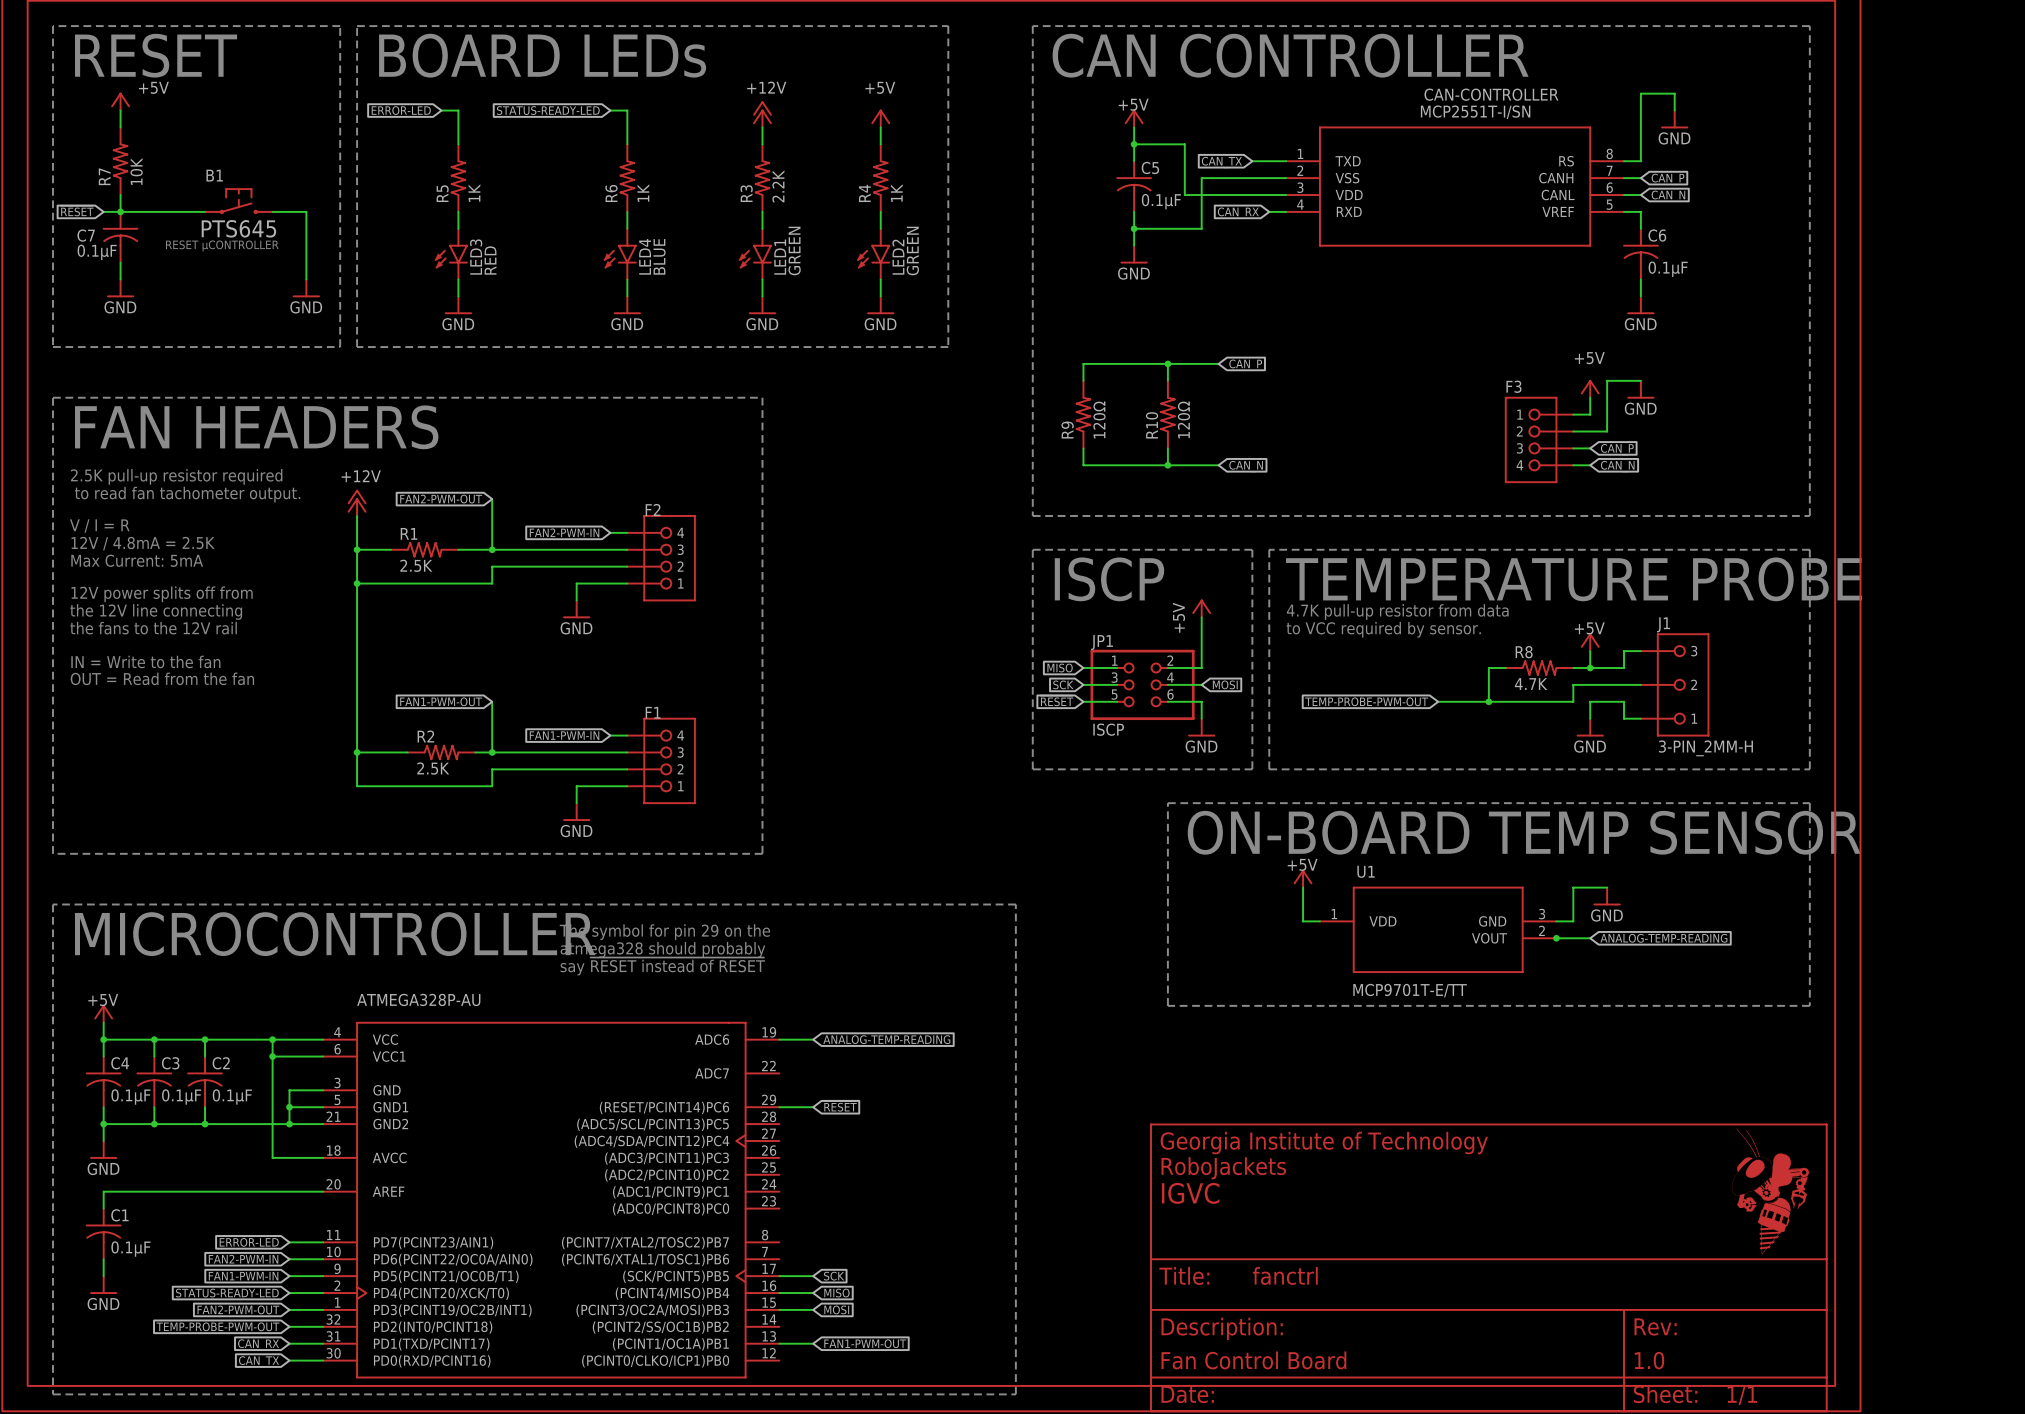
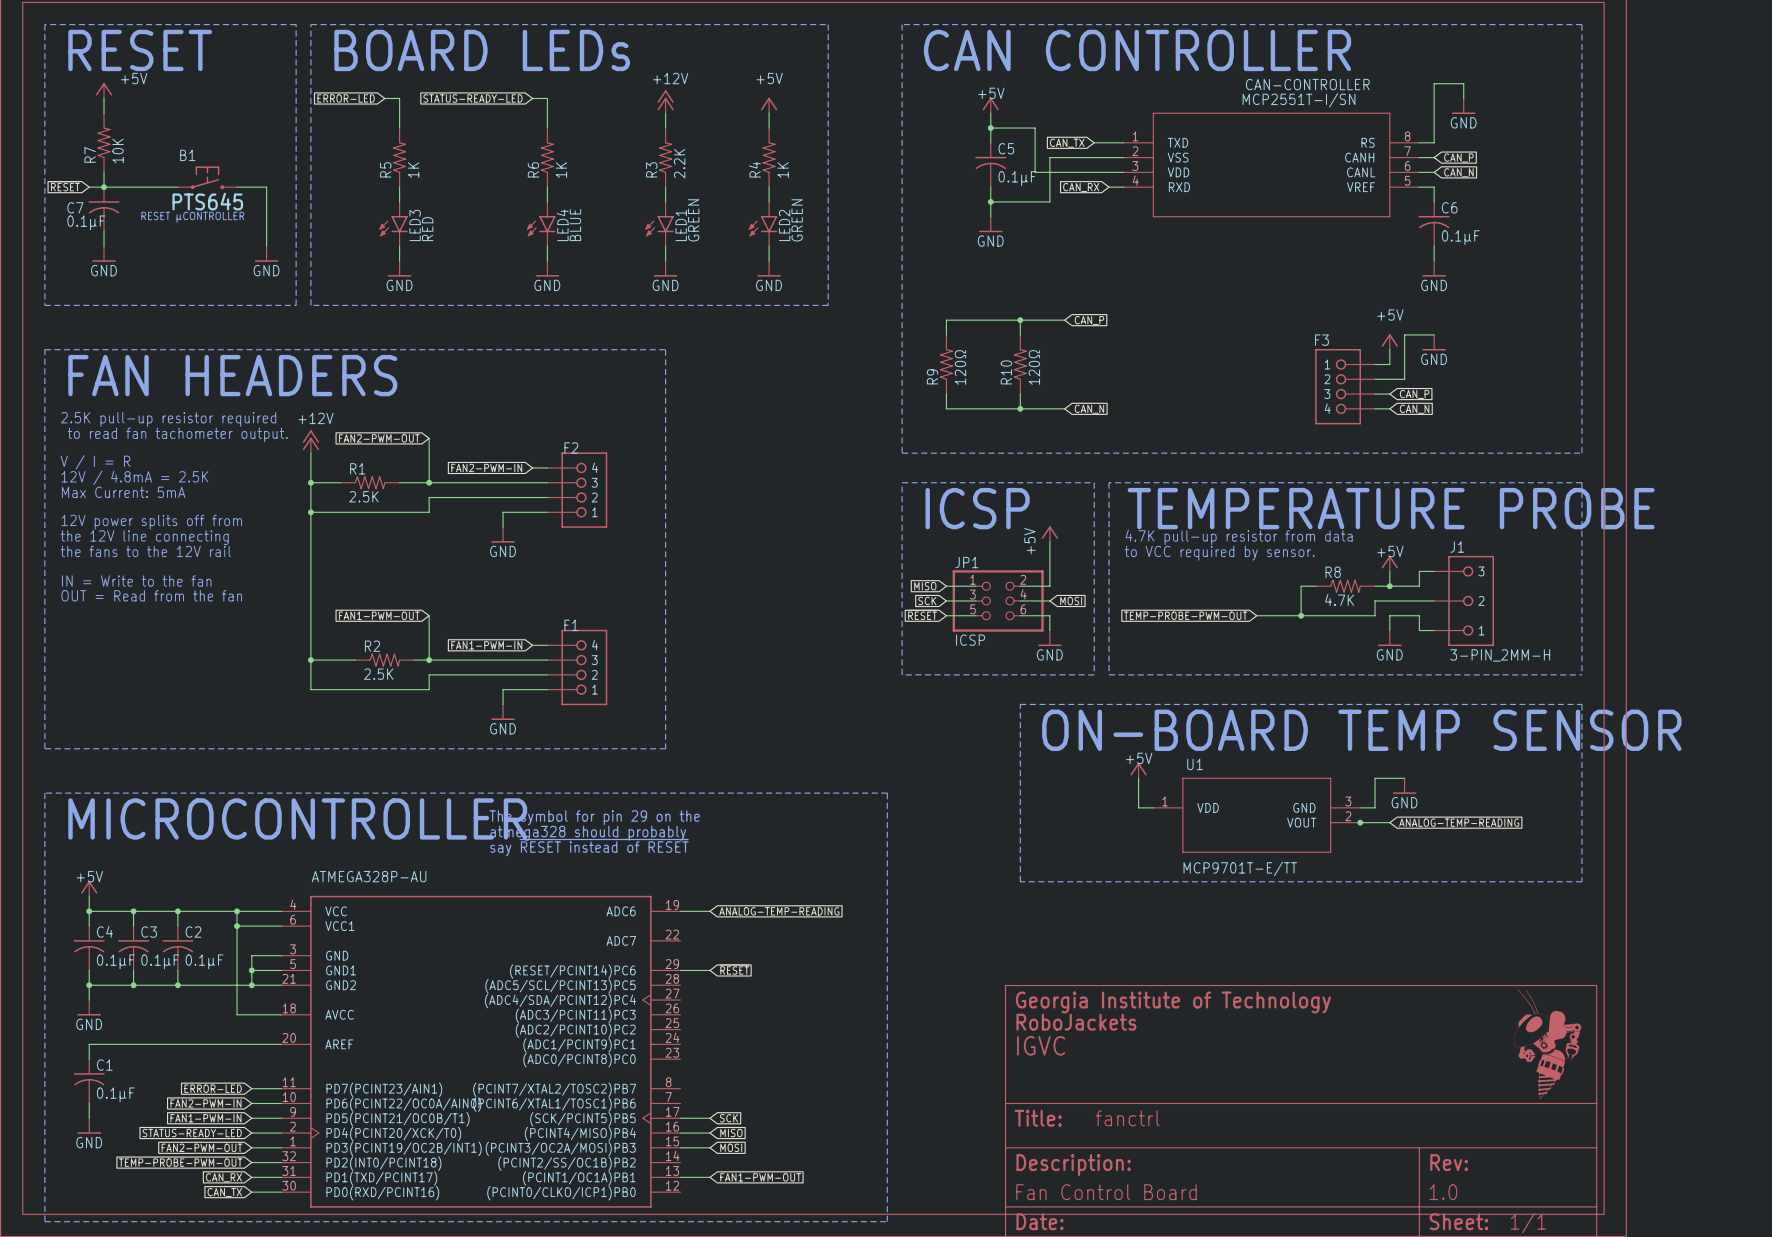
text: ISCP (1109, 579) -> ICSP (977, 508)
JP1 value: ISCP (1108, 729) -> ICSP (970, 640)

